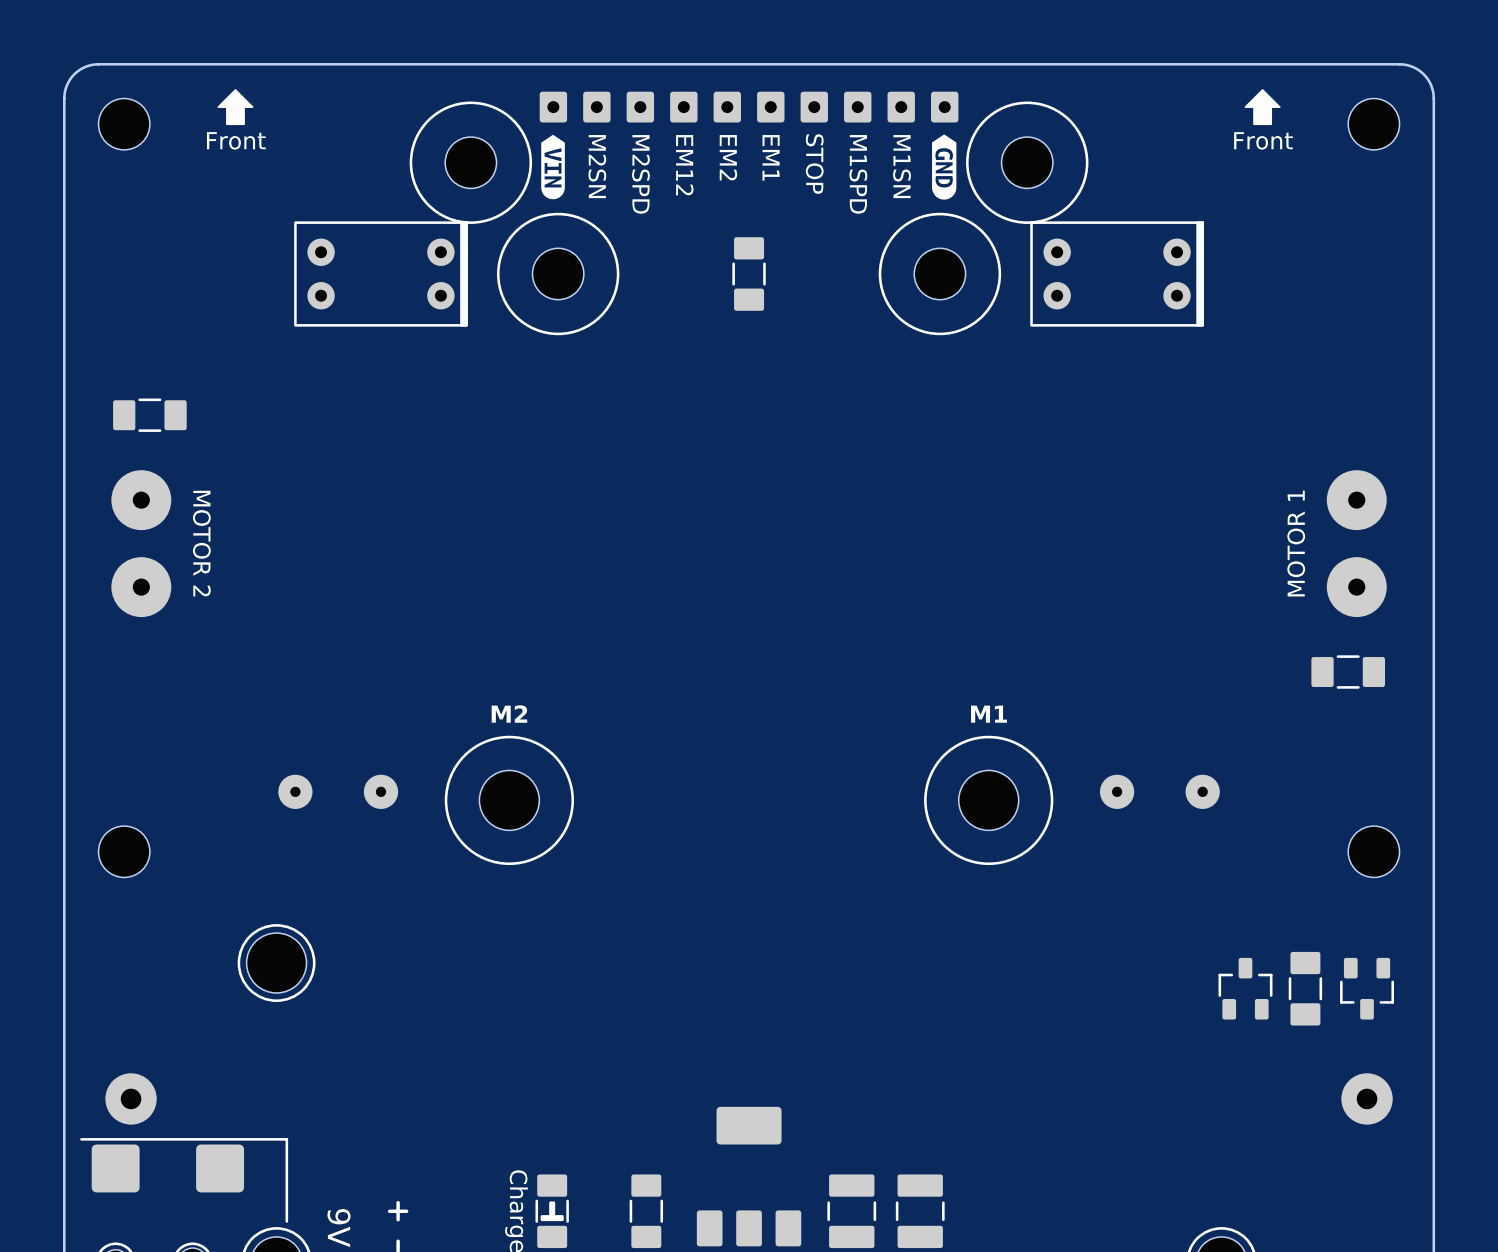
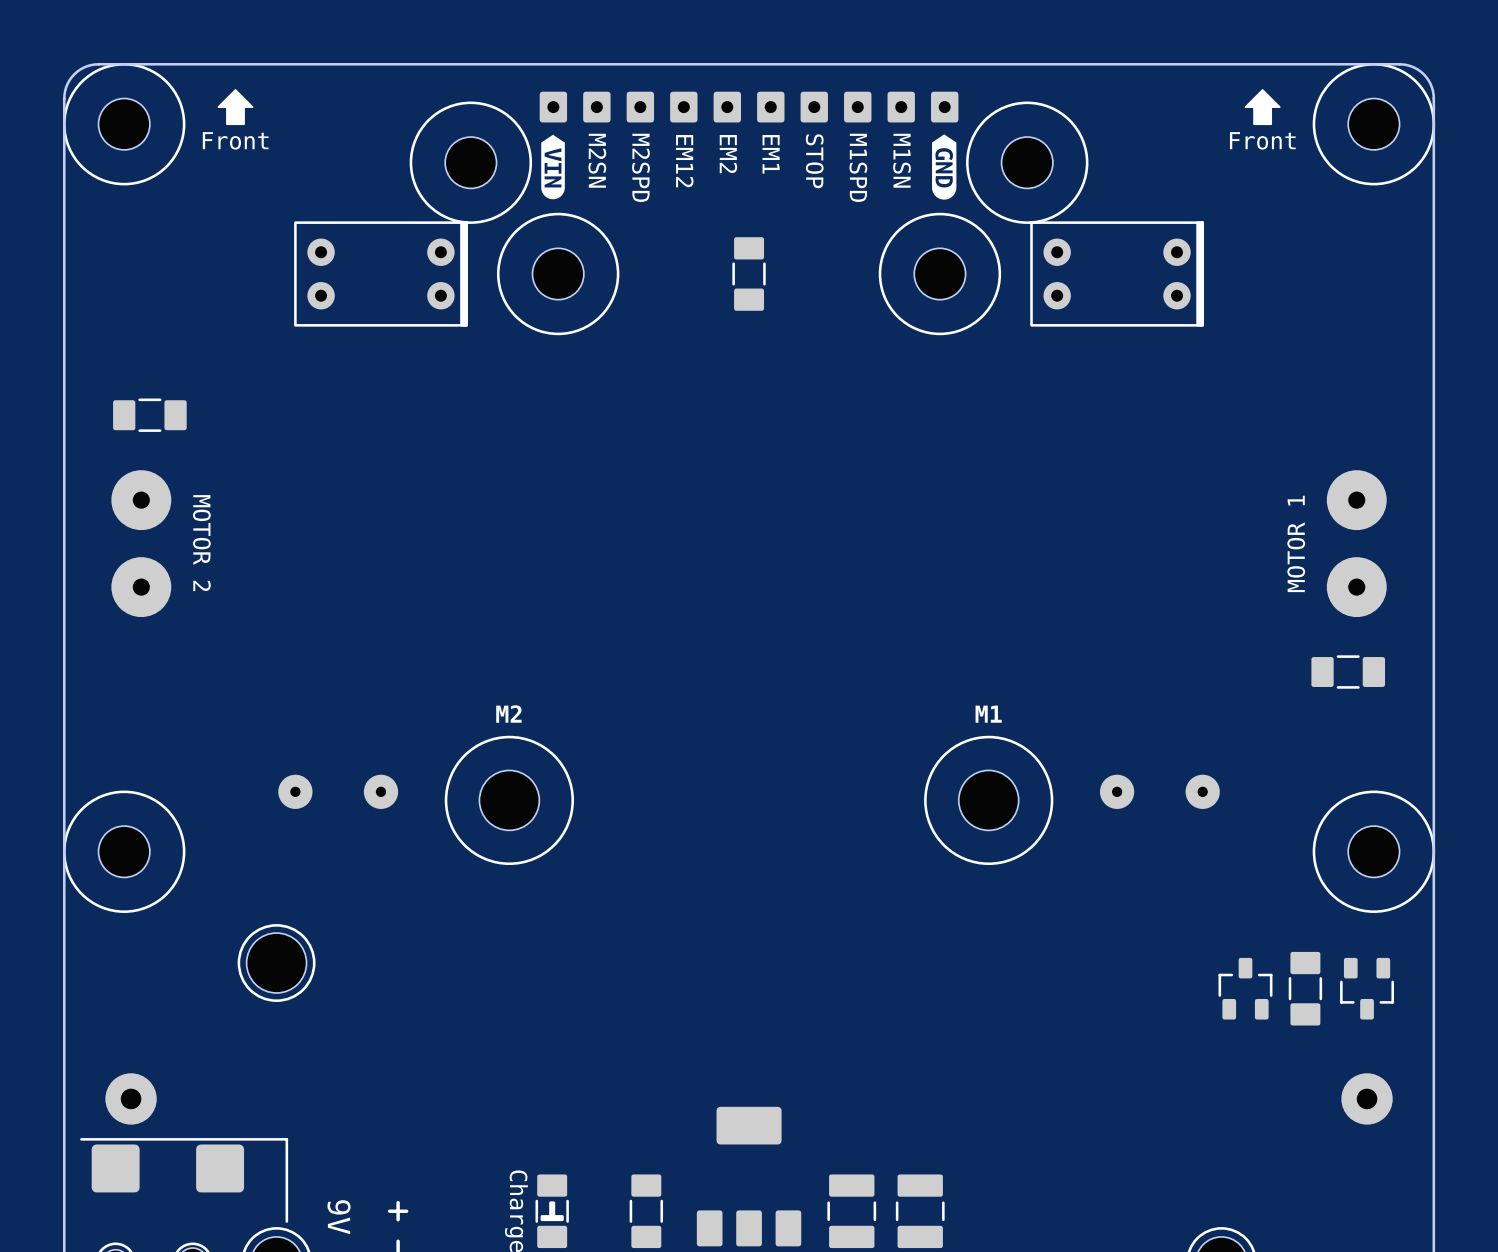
part footprint: [98, 98, 150, 150] -> [63, 63, 186, 186]
part footprint: [1348, 98, 1400, 150] -> [1312, 63, 1436, 186]
part footprint: [98, 826, 150, 878] -> [63, 790, 186, 913]
part footprint: [1348, 826, 1400, 878] -> [1312, 790, 1436, 913]

